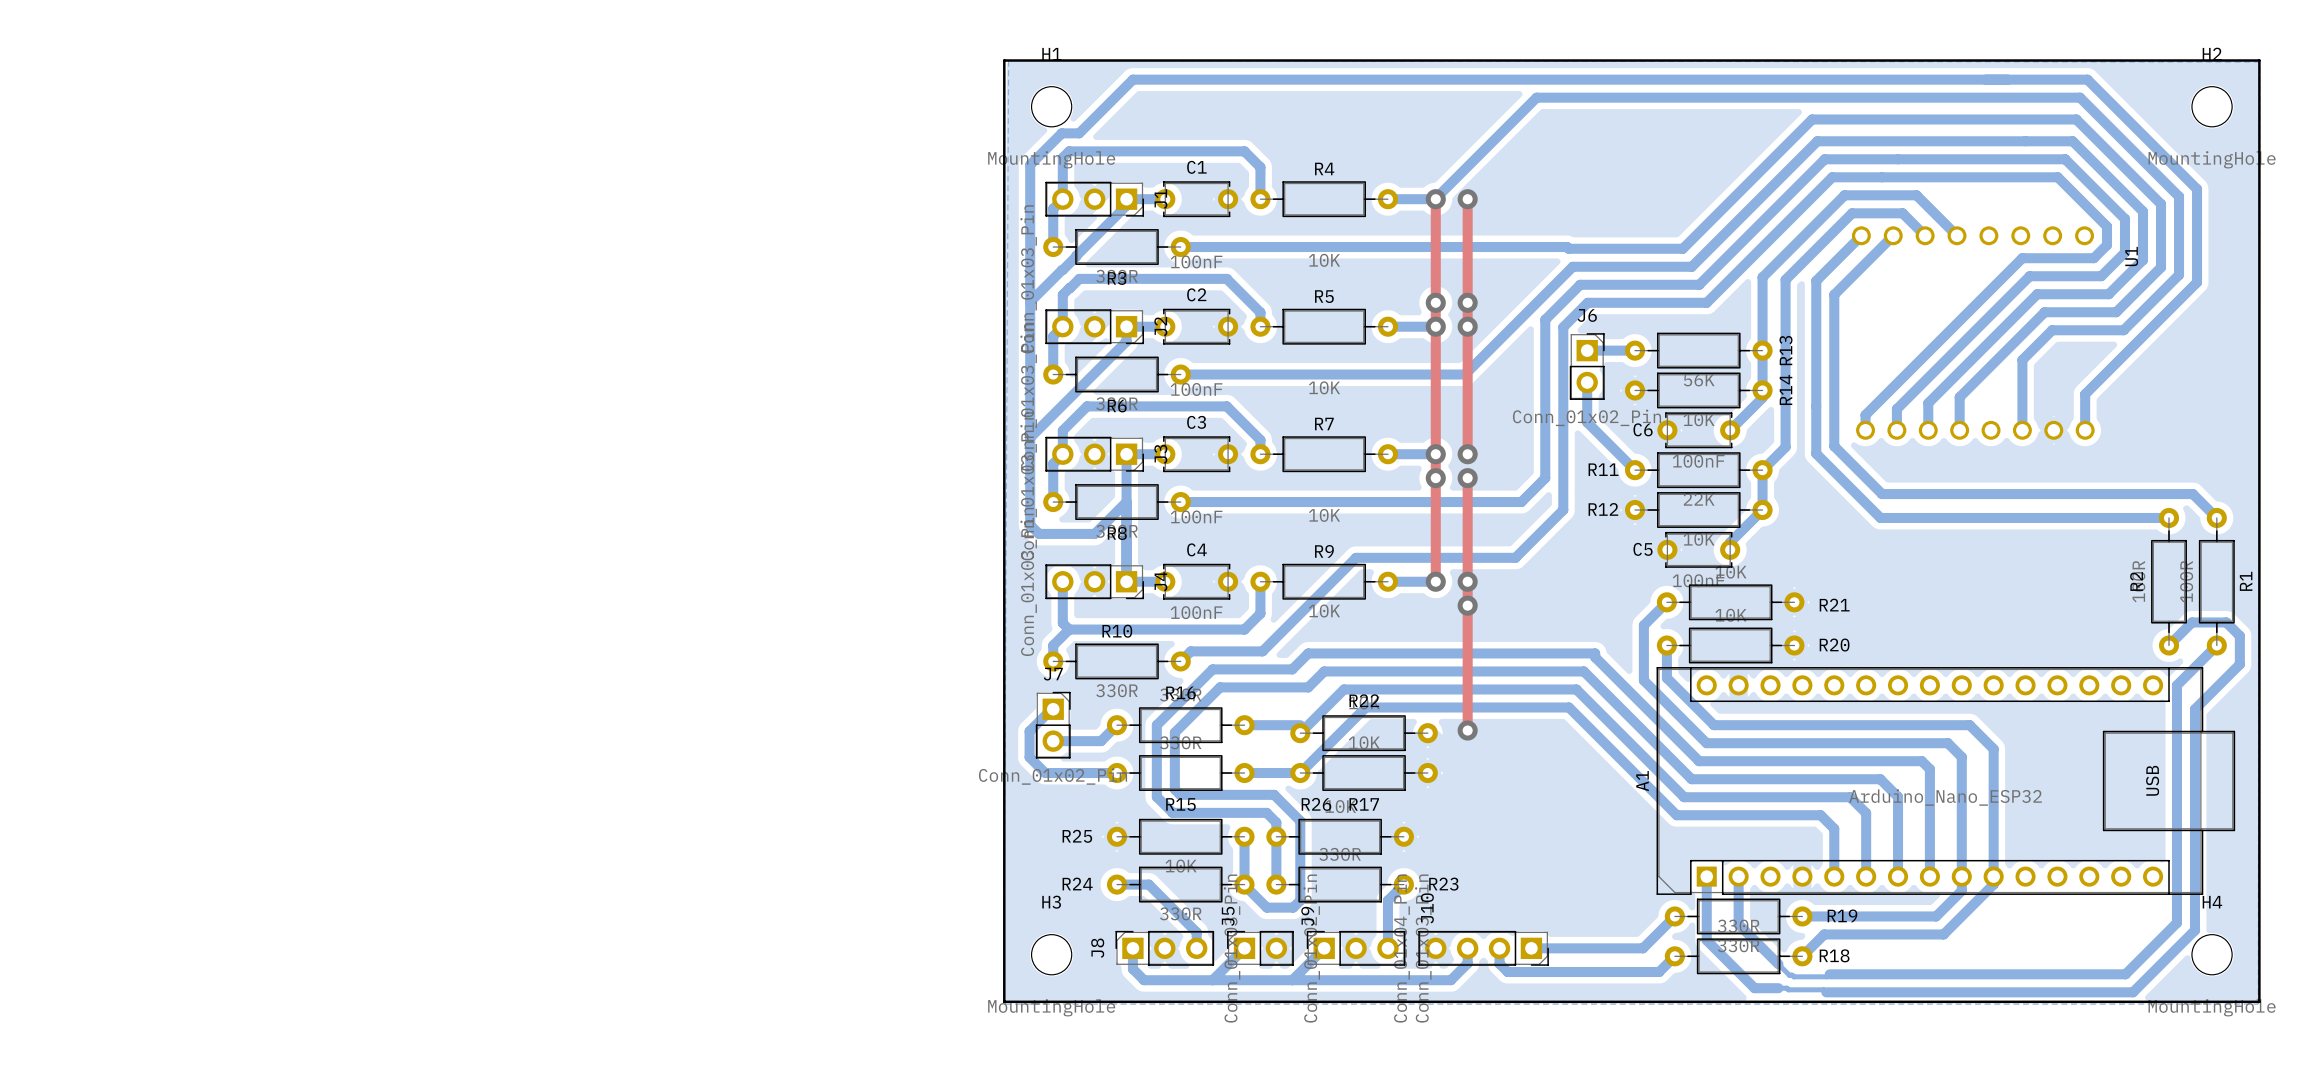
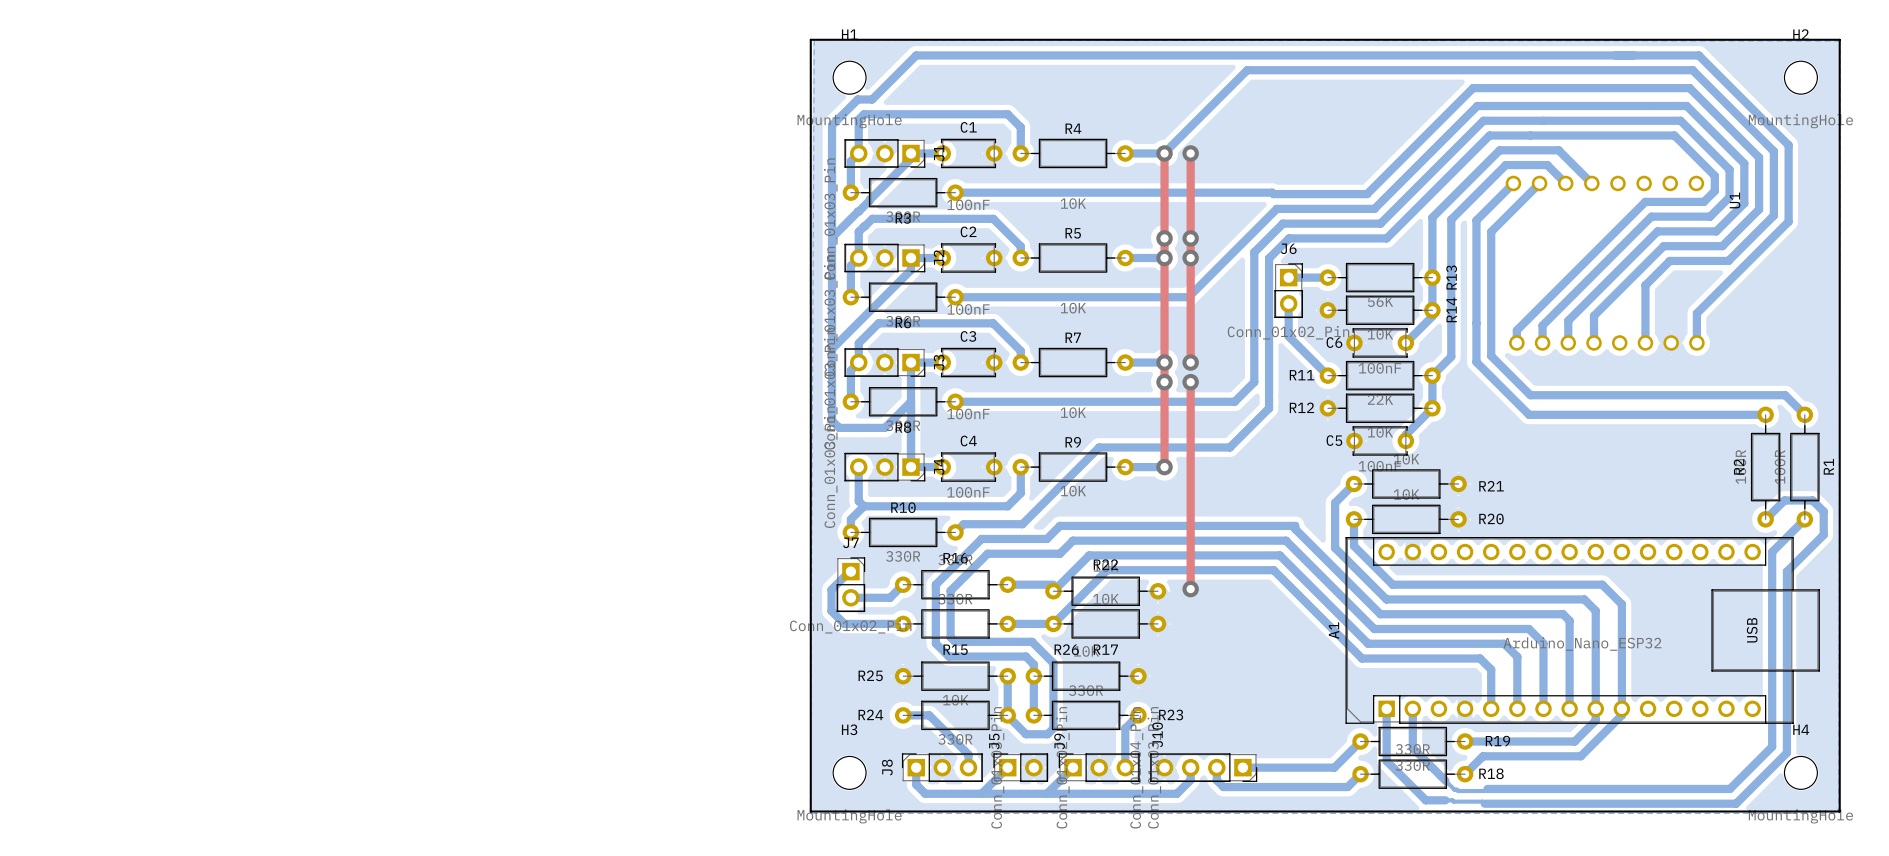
via: (1467, 581) -> none
via: (1467, 605) -> none

